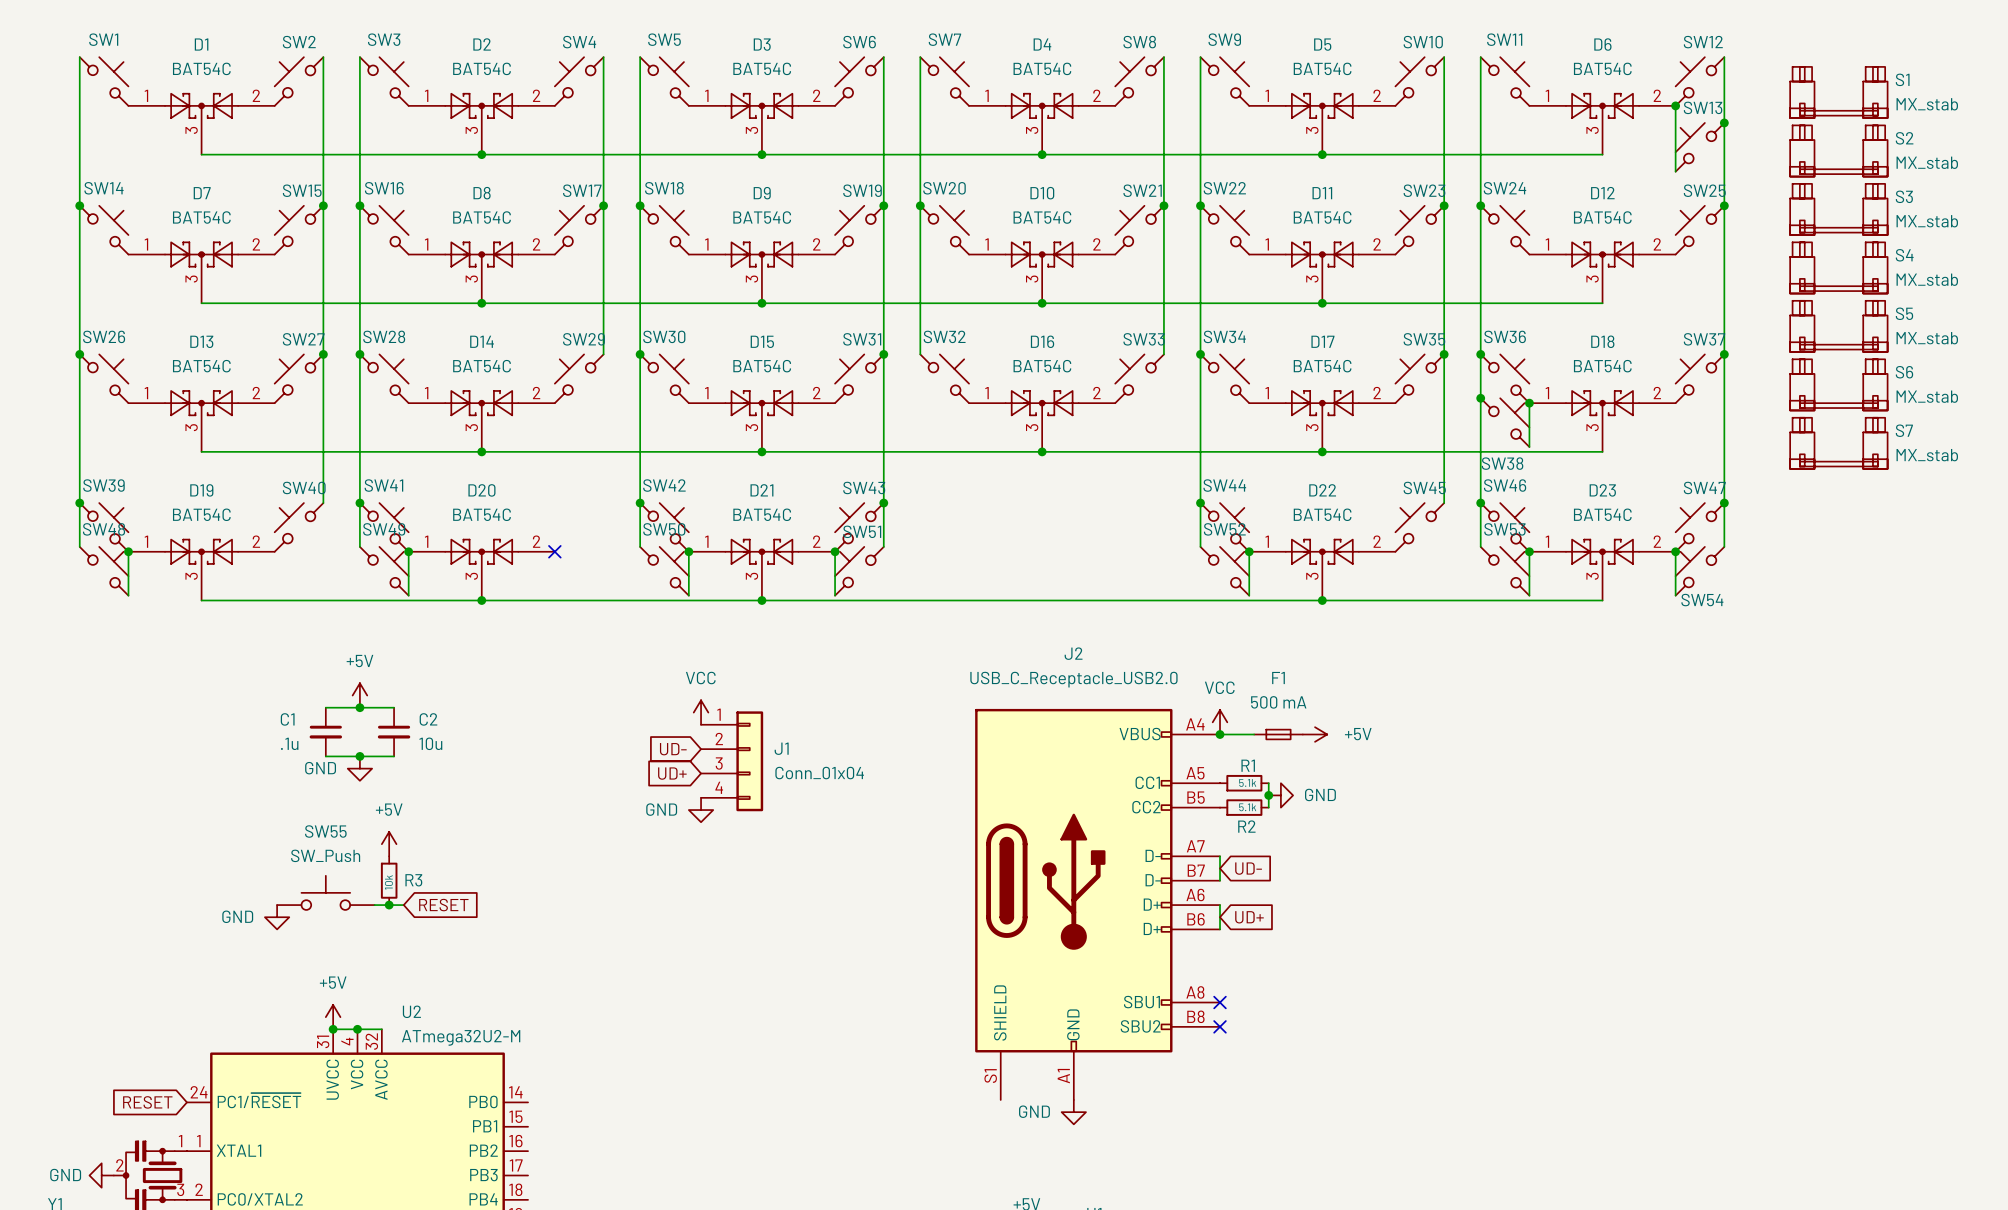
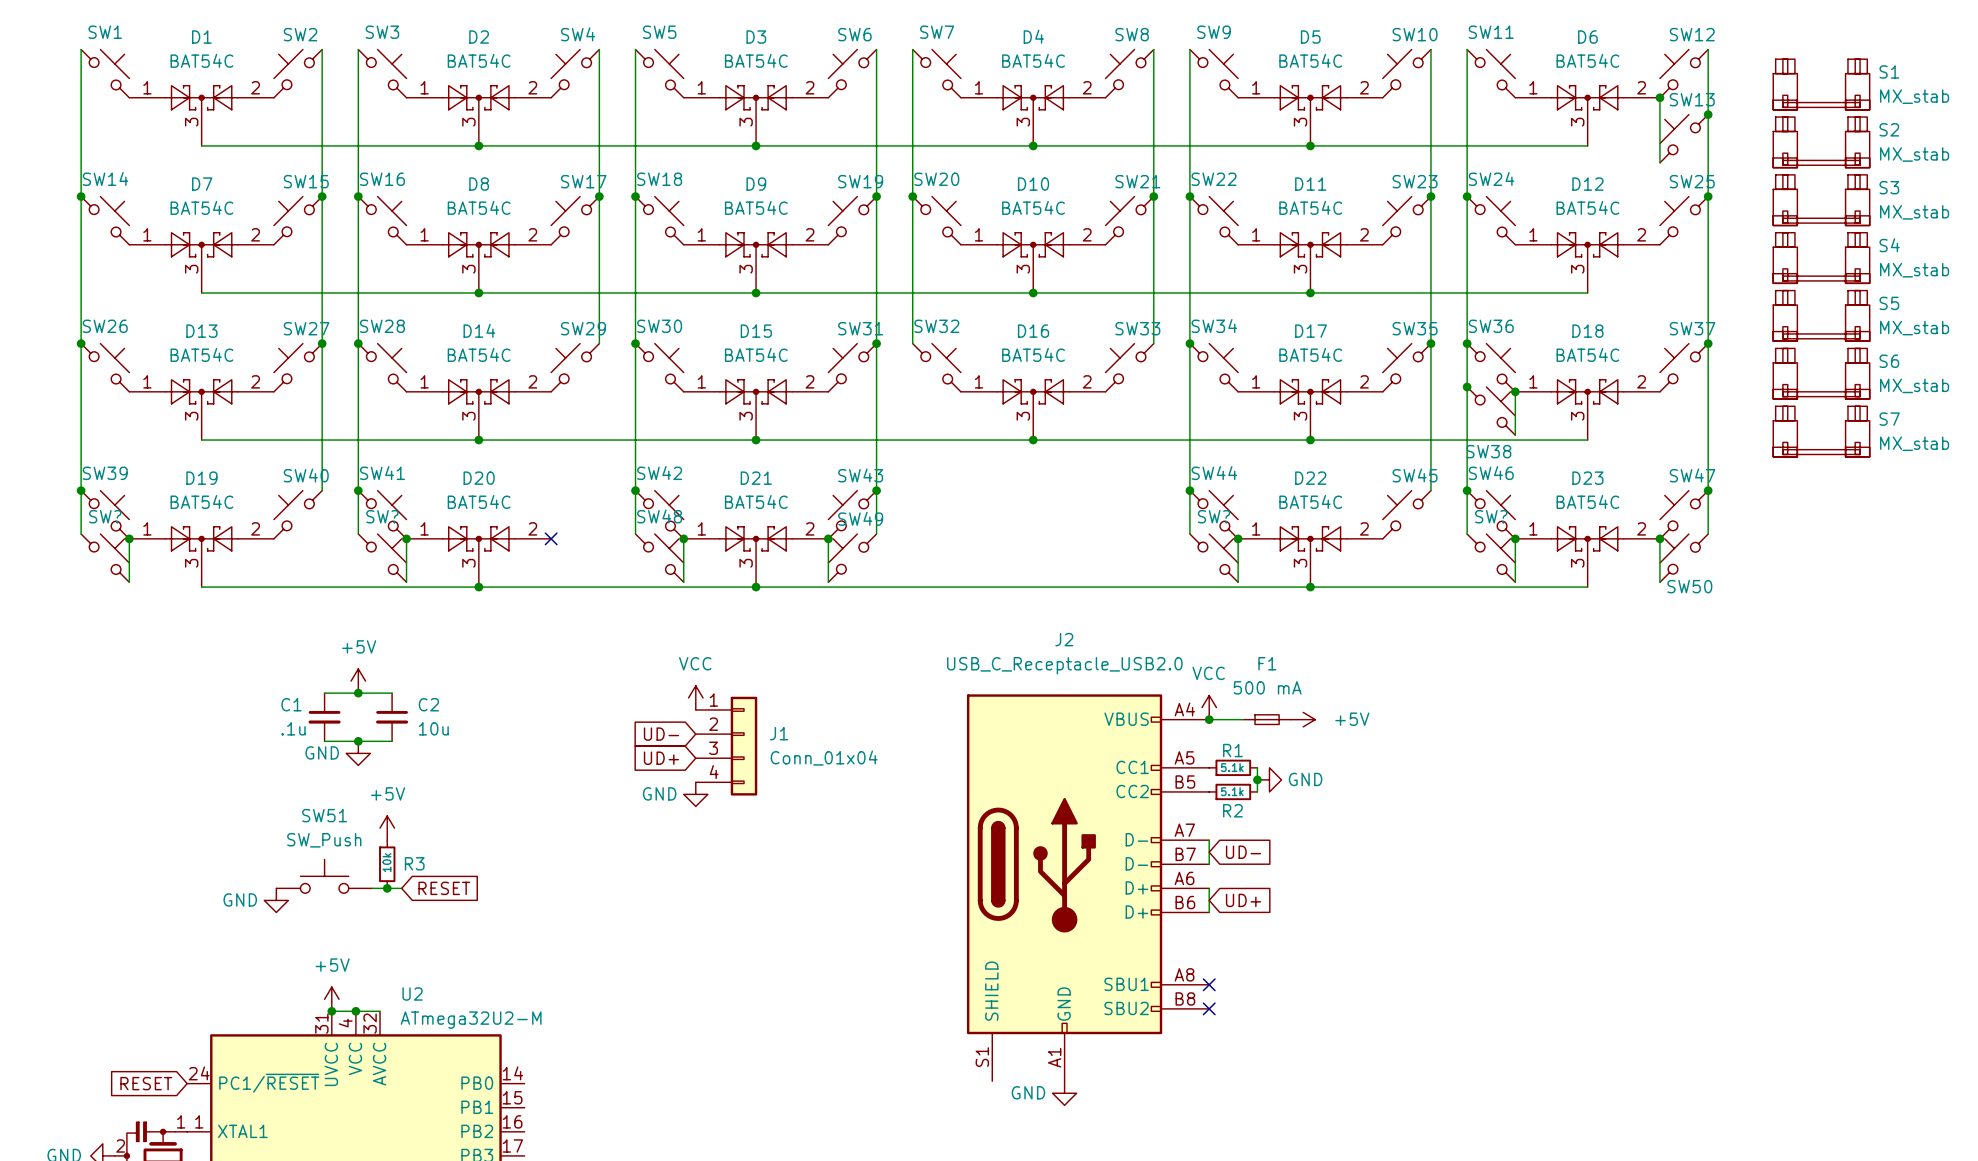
SW48 name: SW48 (104, 529) -> SW? (105, 516)
SW49 name: SW49 (384, 529) -> SW? (382, 516)
SW50 name: SW50 (664, 529) -> SW48 (659, 516)
SW52 name: SW52 (1224, 529) -> SW? (1214, 516)
SW53 name: SW53 (1504, 529) -> SW? (1491, 516)
SW51 name: SW51 (862, 531) -> SW49 (860, 518)
SW54 name: SW54 (1702, 600) -> SW50 (1689, 586)
SW55 name: SW55 (325, 831) -> SW51 (324, 815)

